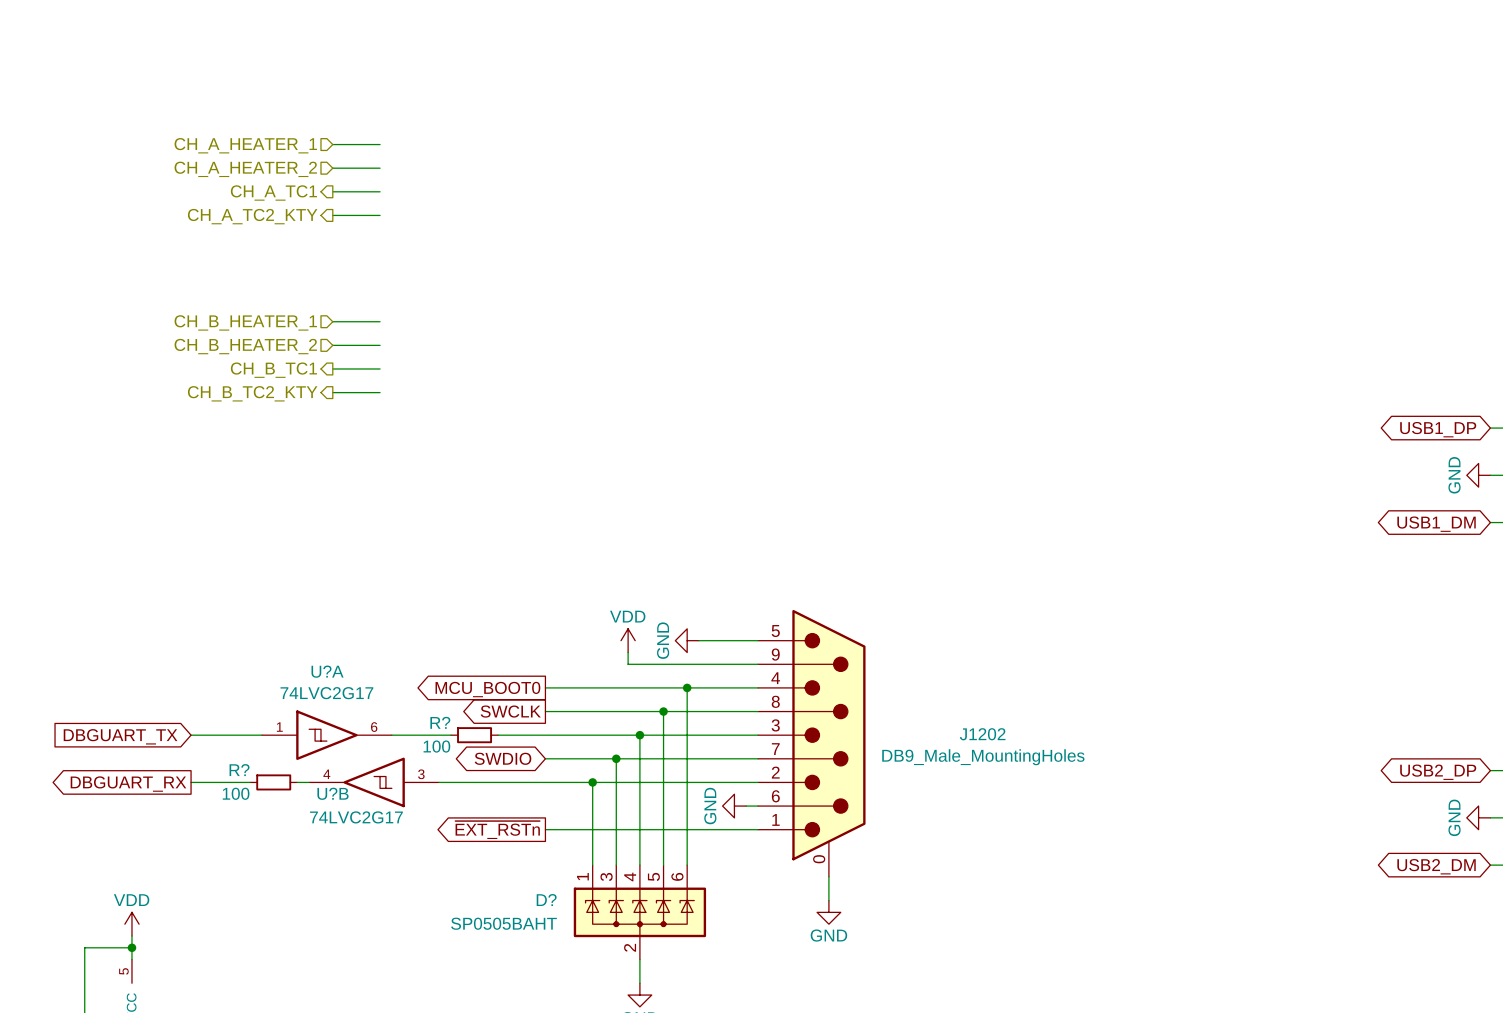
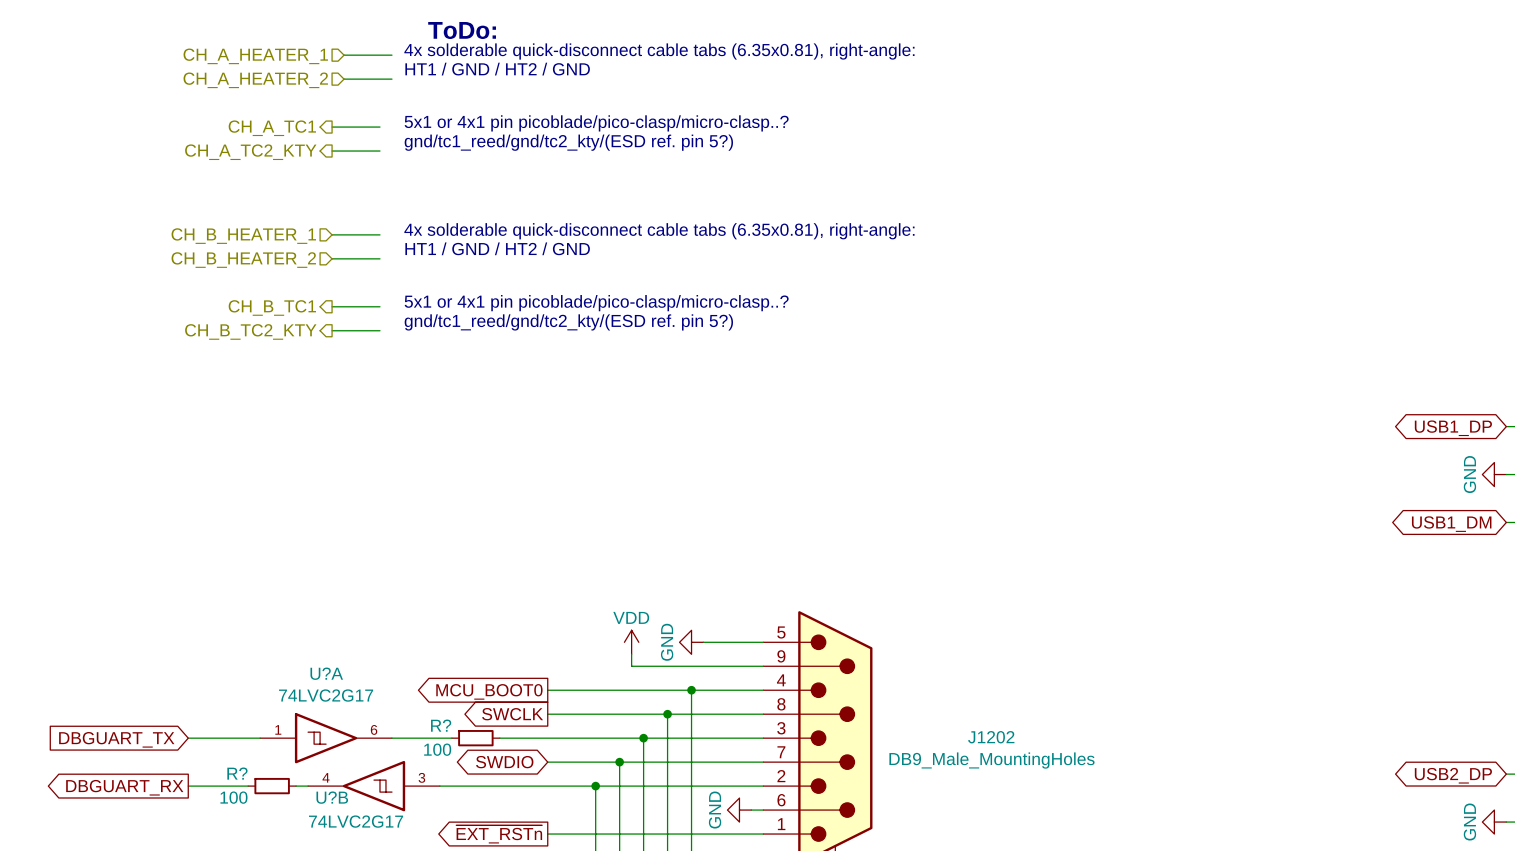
text: none -> ToDo: (462, 30)
text: none -> 4x solderable quick-disconnect cable tabs (6.35x0.81), right-angle: (659, 51)
wire: none -> (344, 55) (391, 55)
text: none -> HT1 / GND / HT2 / GND (497, 69)
text: none -> 5x1 or 4x1 pin picoblade/pico-clasp/micro-clasp..? (596, 123)
wire: (332, 144) (380, 144) -> (332, 234) (379, 234)
hierarchical label position: CH_A_HEATER_1 (245, 145) -> CH_A_HEATER_1 (255, 56)
text: none -> gnd/tc1_reed/gnd/tc2_kty/(ESD ref. pin 5?) (568, 142)
wire: (332, 168) (380, 168) -> (344, 79) (391, 79)
hierarchical label position: CH_A_HEATER_2 (245, 169) -> CH_A_HEATER_2 (255, 80)
wire: (332, 191) (380, 191) -> (332, 127) (379, 127)
hierarchical label position: CH_A_TC1 (273, 192) -> CH_A_TC1 (272, 128)
wire: (332, 215) (380, 215) -> (332, 151) (379, 151)
hierarchical label position: CH_A_TC2_KTY (252, 216) -> CH_A_TC2_KTY (250, 152)
text: none -> 4x solderable quick-disconnect cable tabs (6.35x0.81), right-angle: (659, 231)
text: none -> HT1 / GND / HT2 / GND (497, 248)
text: none -> 5x1 or 4x1 pin picoblade/pico-clasp/micro-clasp..? (596, 303)
wire: (332, 321) (380, 321) -> (332, 258) (379, 258)
hierarchical label position: CH_B_HEATER_1 (245, 322) -> CH_B_HEATER_1 (243, 236)
text: none -> gnd/tc1_reed/gnd/tc2_kty/(ESD ref. pin 5?) (568, 322)
wire: (332, 345) (380, 345) -> none
hierarchical label position: CH_B_HEATER_2 (245, 346) -> CH_B_HEATER_2 (243, 260)
wire: (332, 368) (380, 368) -> (332, 306) (379, 306)
hierarchical label position: CH_B_TC1 (273, 370) -> CH_B_TC1 (272, 307)
wire: (332, 392) (380, 392) -> (332, 330) (379, 330)
hierarchical label position: CH_B_TC2_KTY (252, 393) -> CH_B_TC2_KTY (250, 331)

